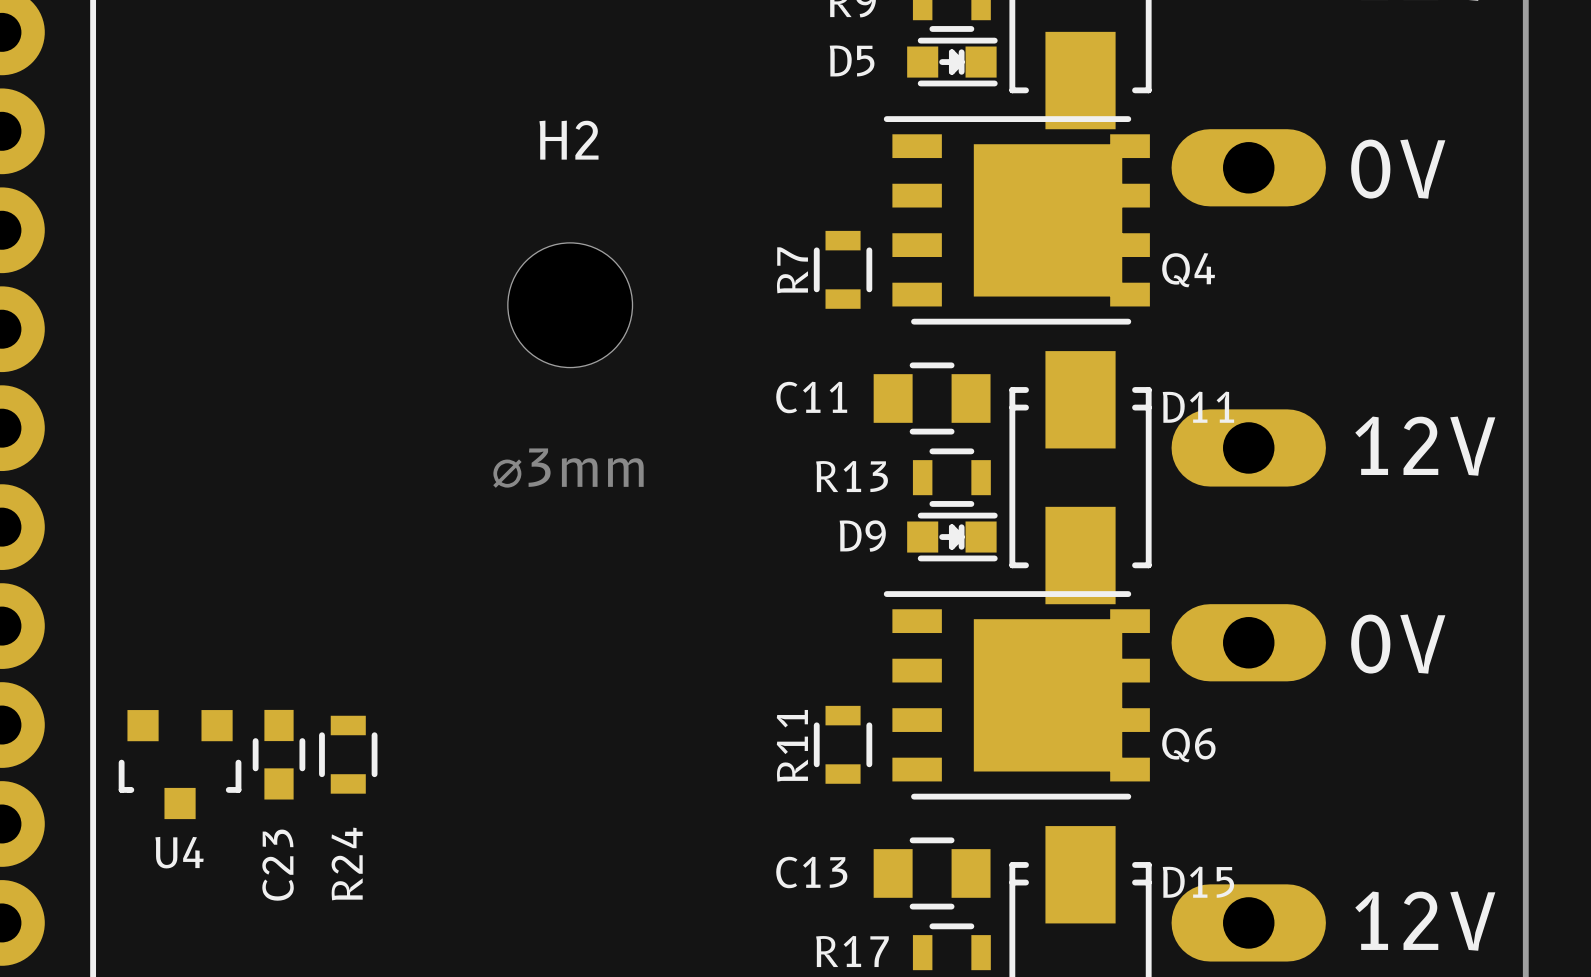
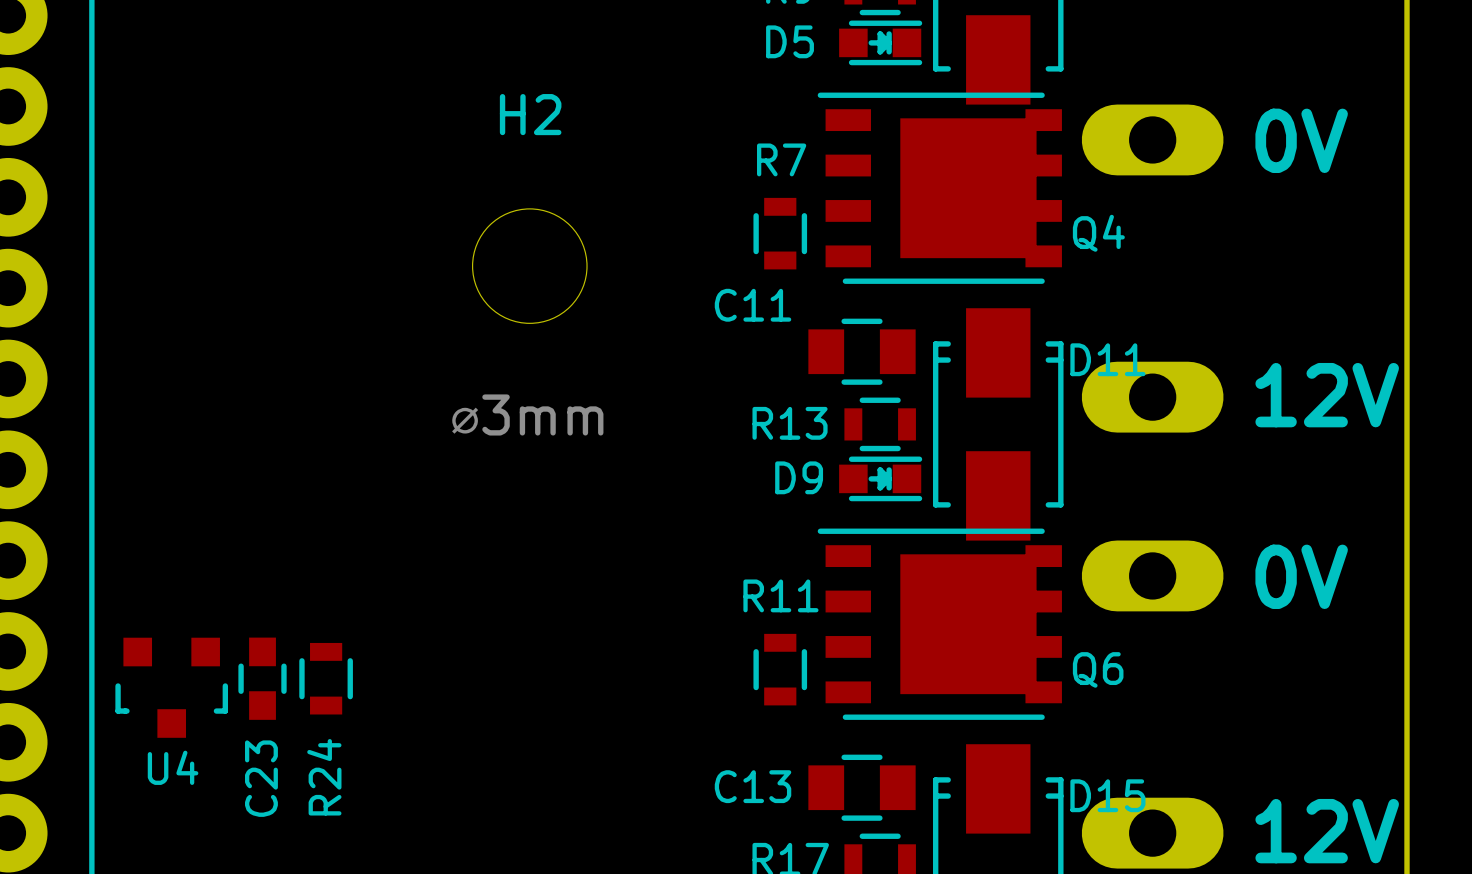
R7 name rotation: 0° (792, 270) -> 90° clockwise (781, 159)
R7 name position: R7 (792, 270) -> R7 (781, 159)
C11 name position: C11 (811, 397) -> C11 (753, 305)
R11 name rotation: 0° (792, 745) -> 90° clockwise (780, 595)

